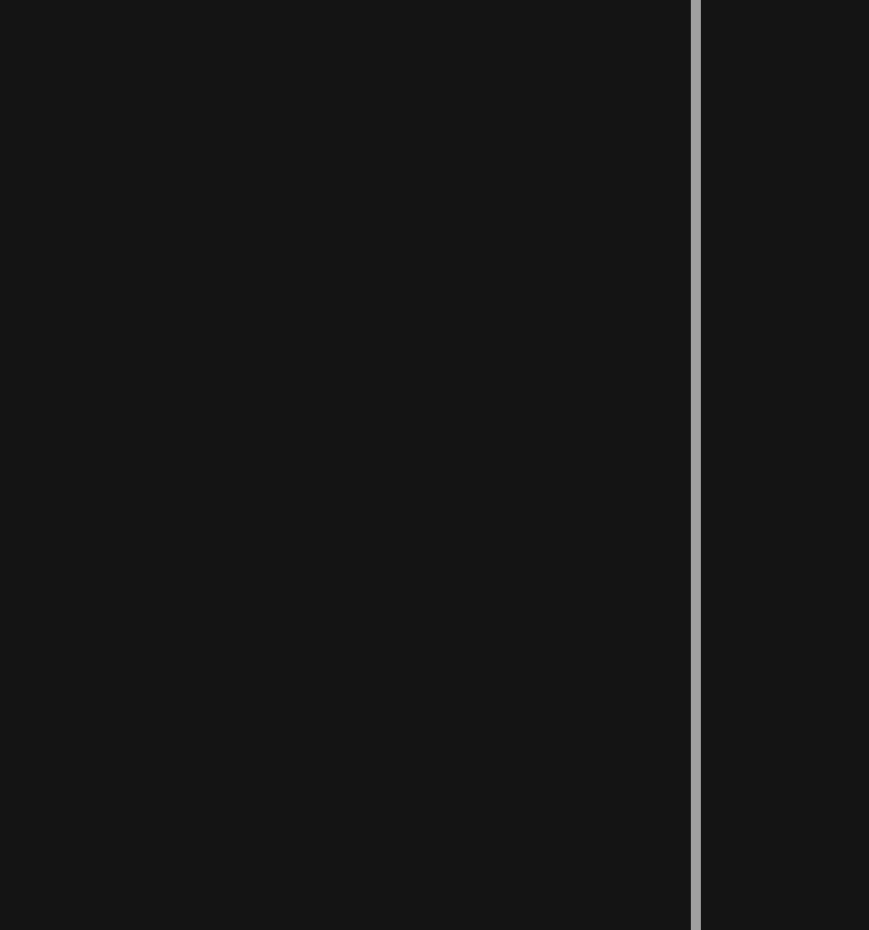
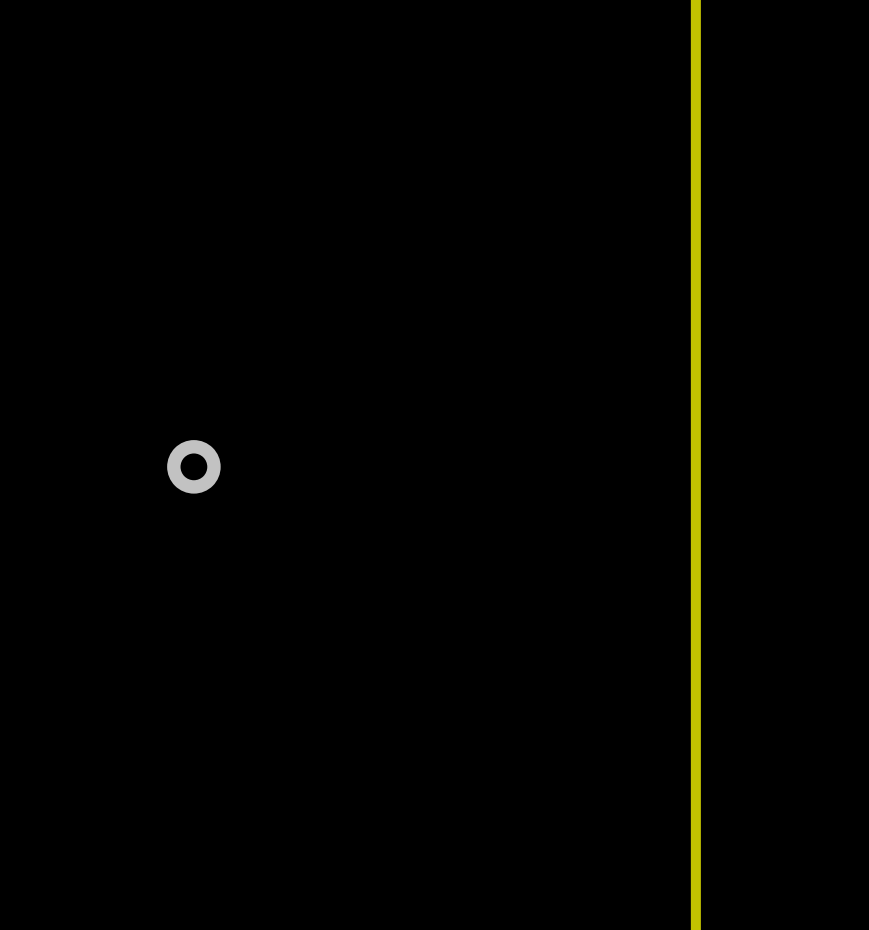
via: none -> (193, 466)

